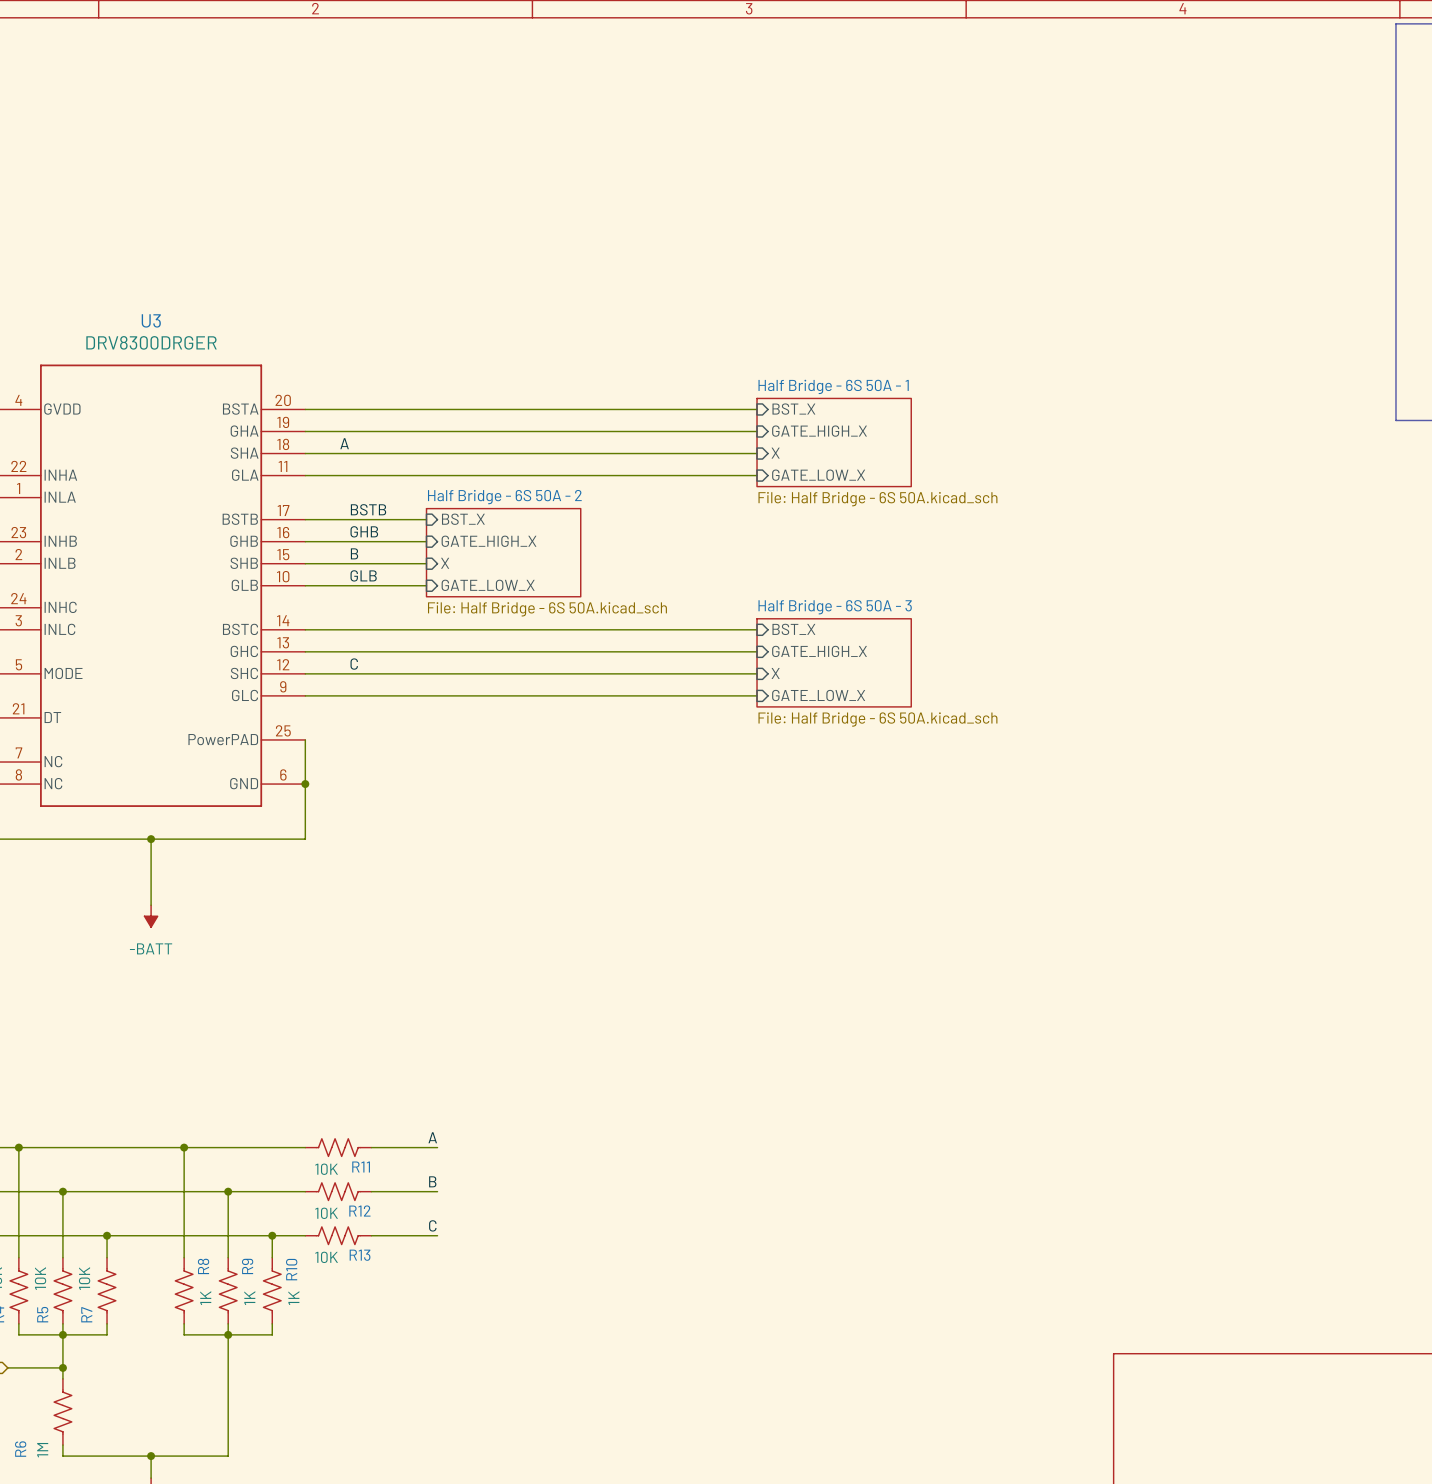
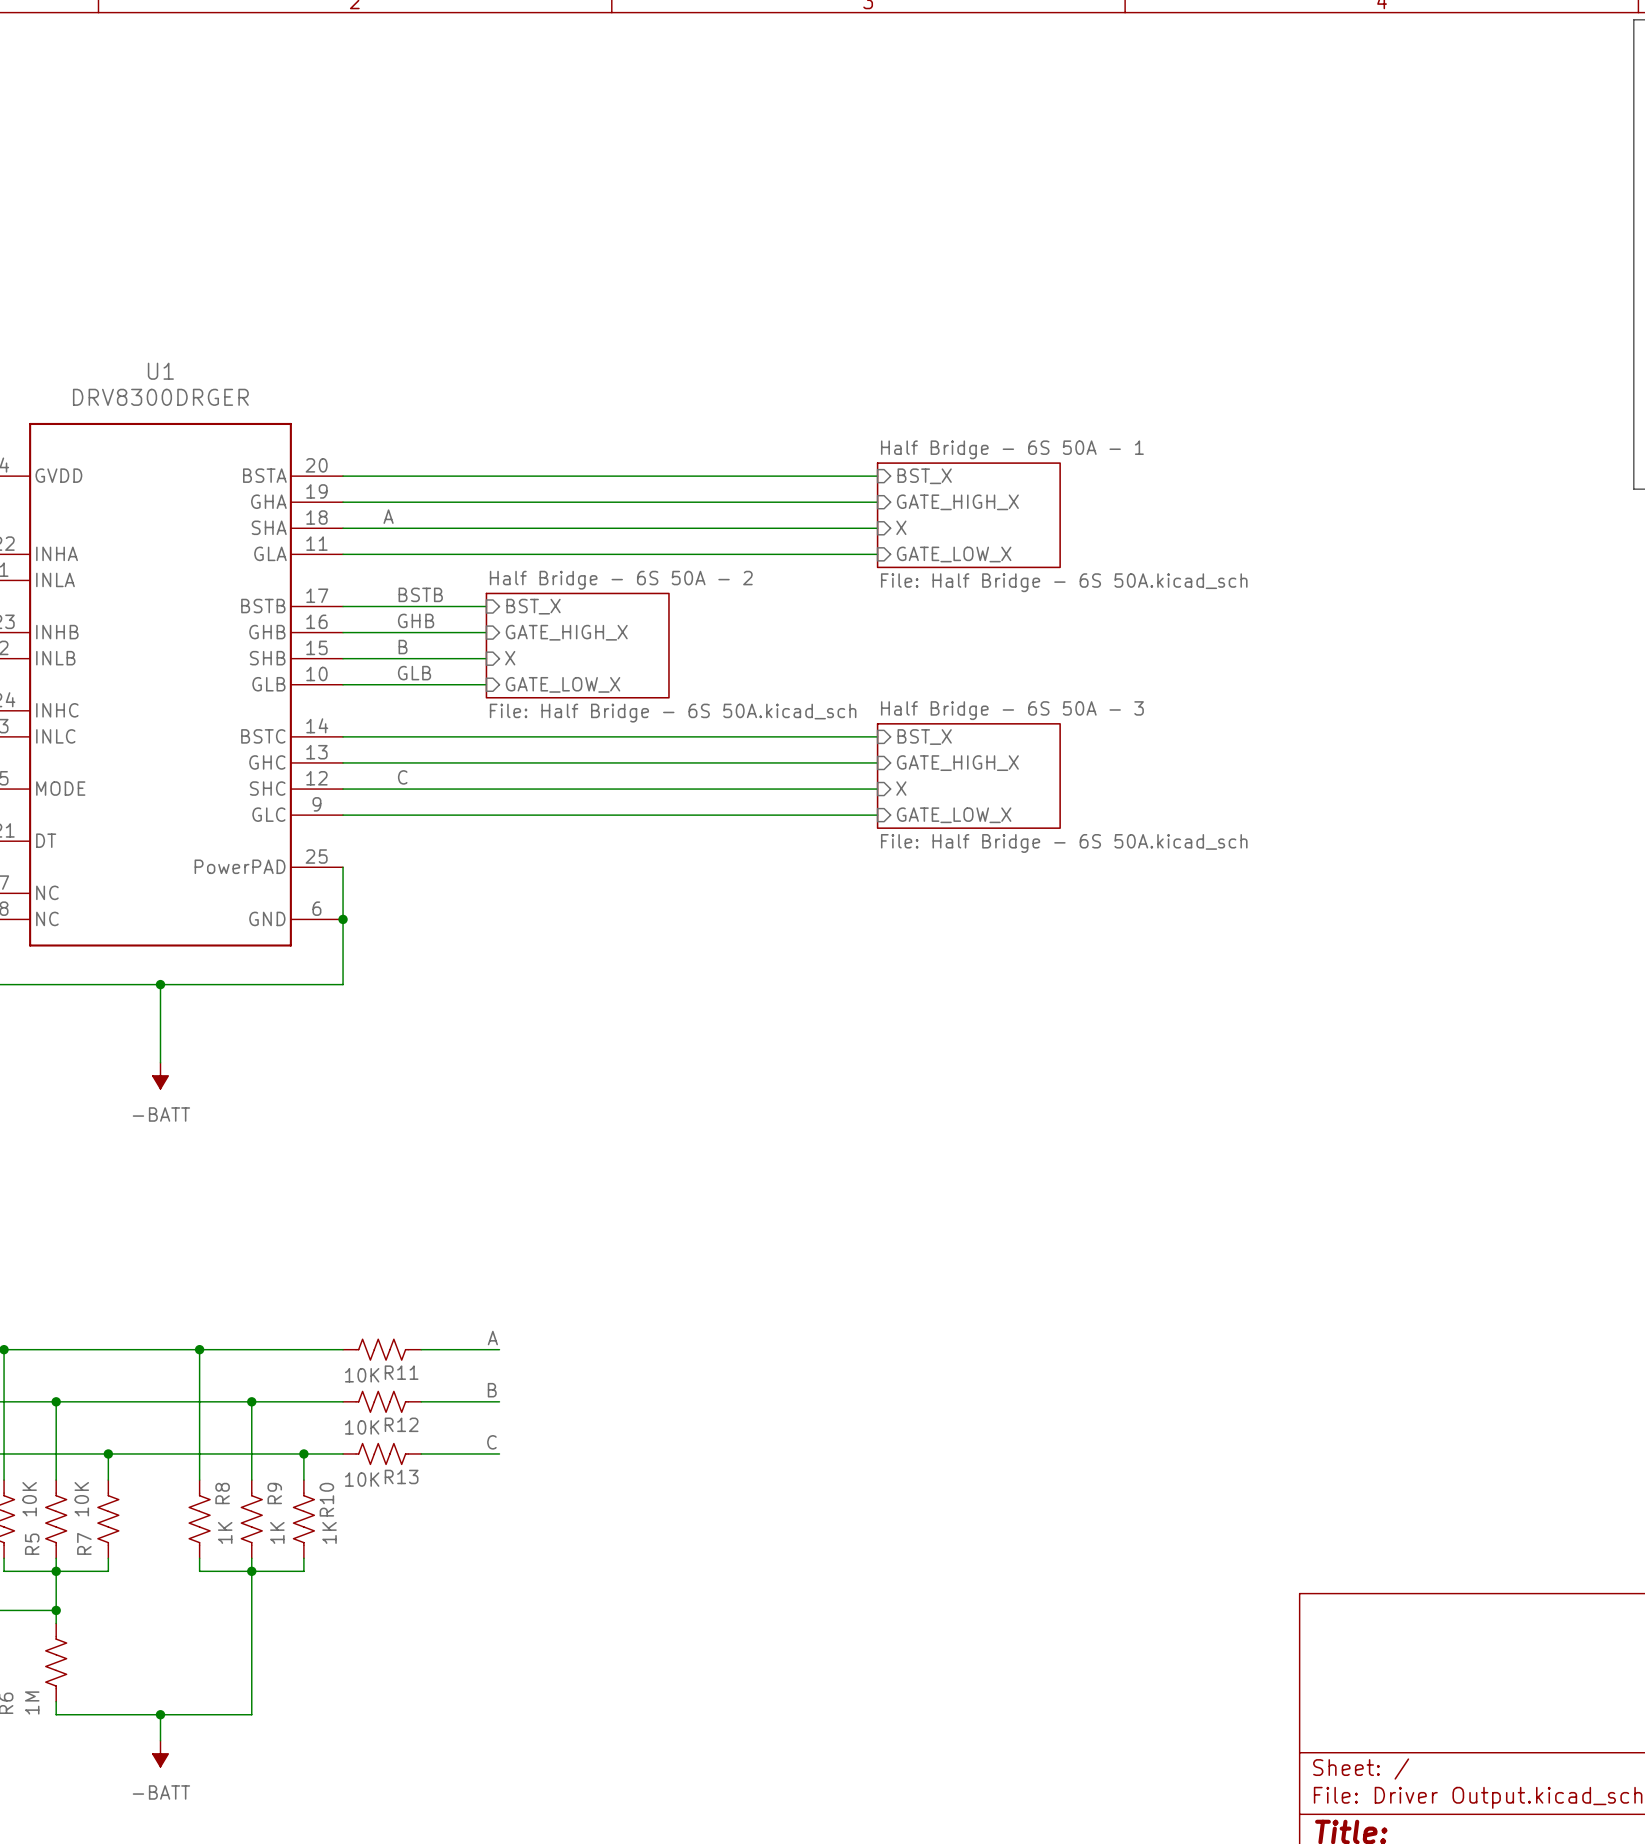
U3 name: U3 (151, 320) -> U1 (160, 371)

